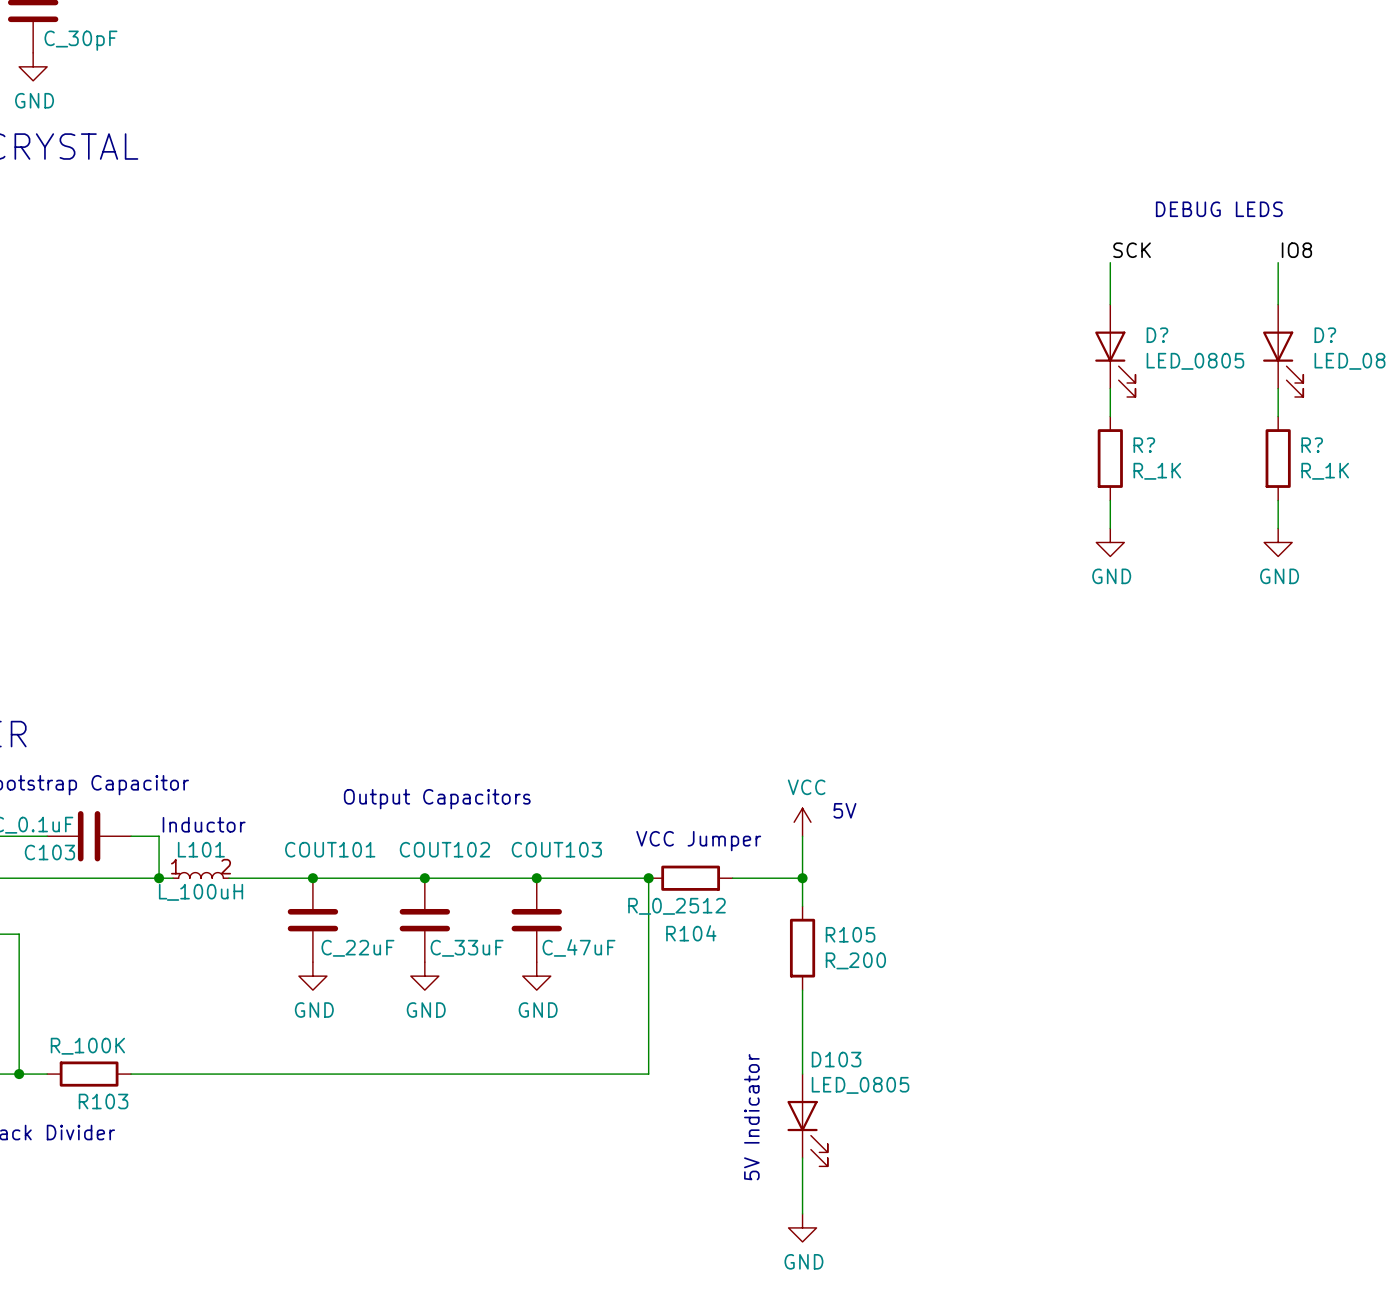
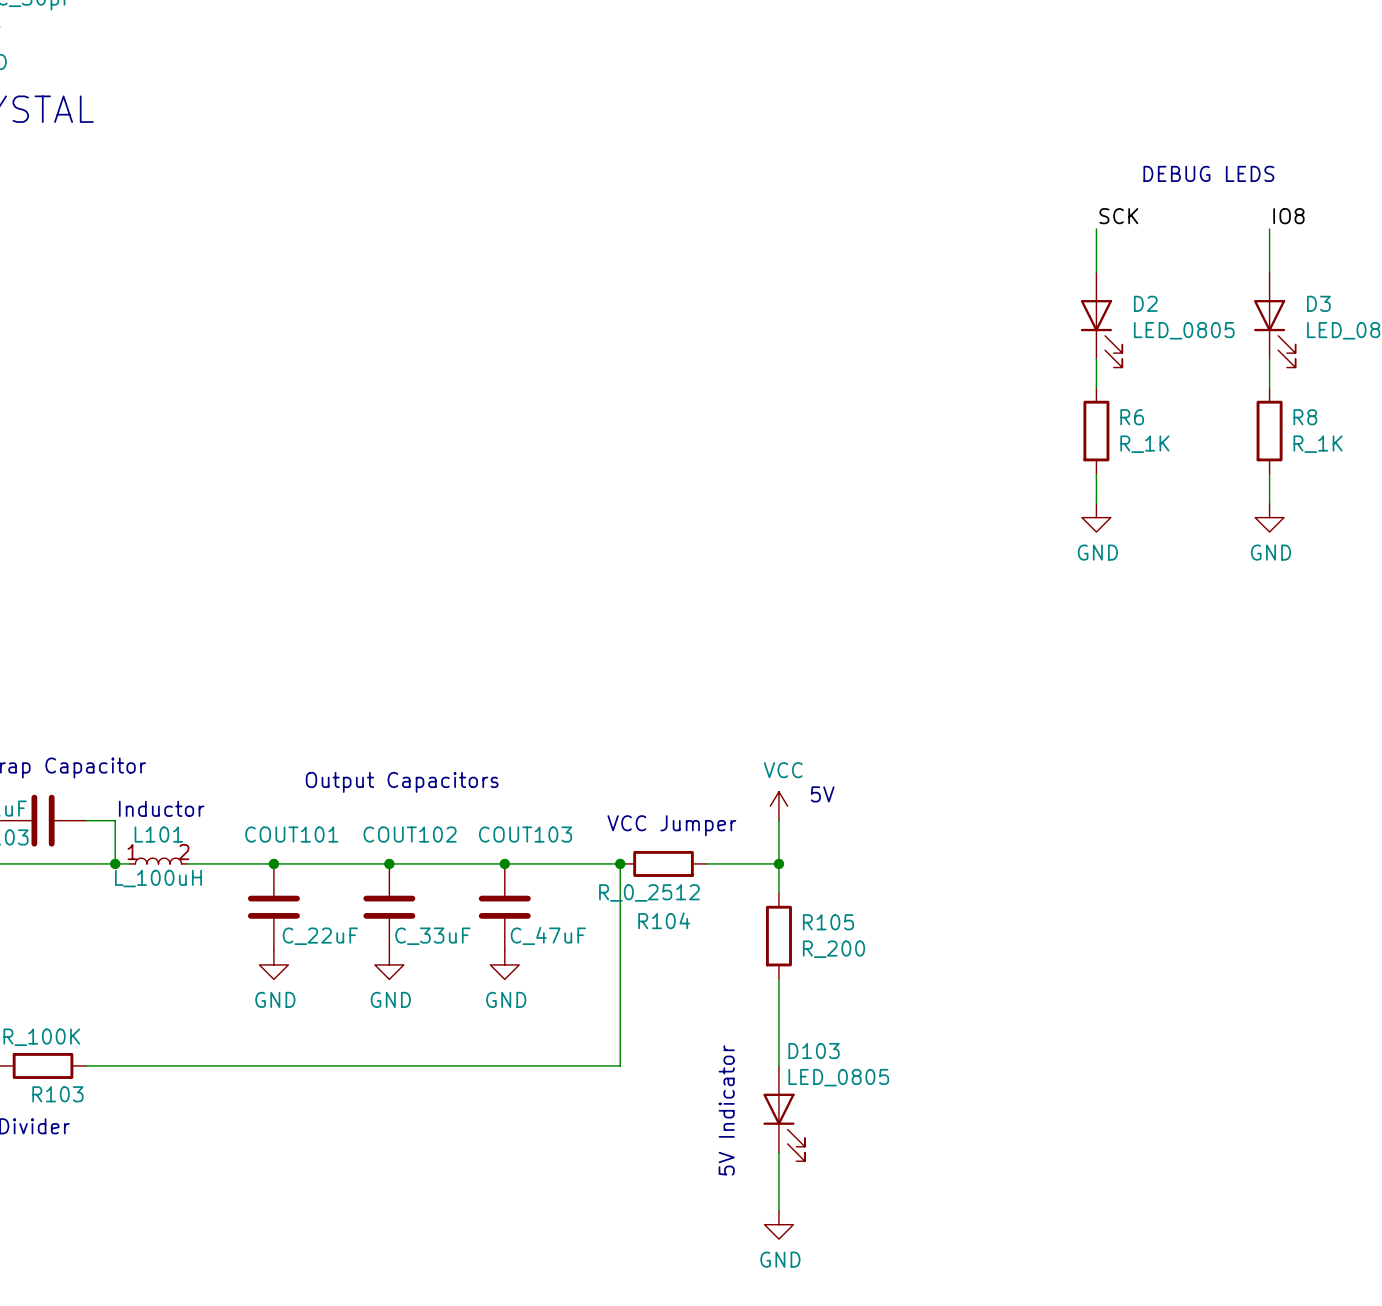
D? name: D? (1157, 335) -> D2 (1145, 303)
D? name: D? (1325, 335) -> D3 (1318, 303)
R? name: R? (1144, 445) -> R6 (1132, 417)
R? name: R? (1312, 445) -> R8 (1305, 417)

